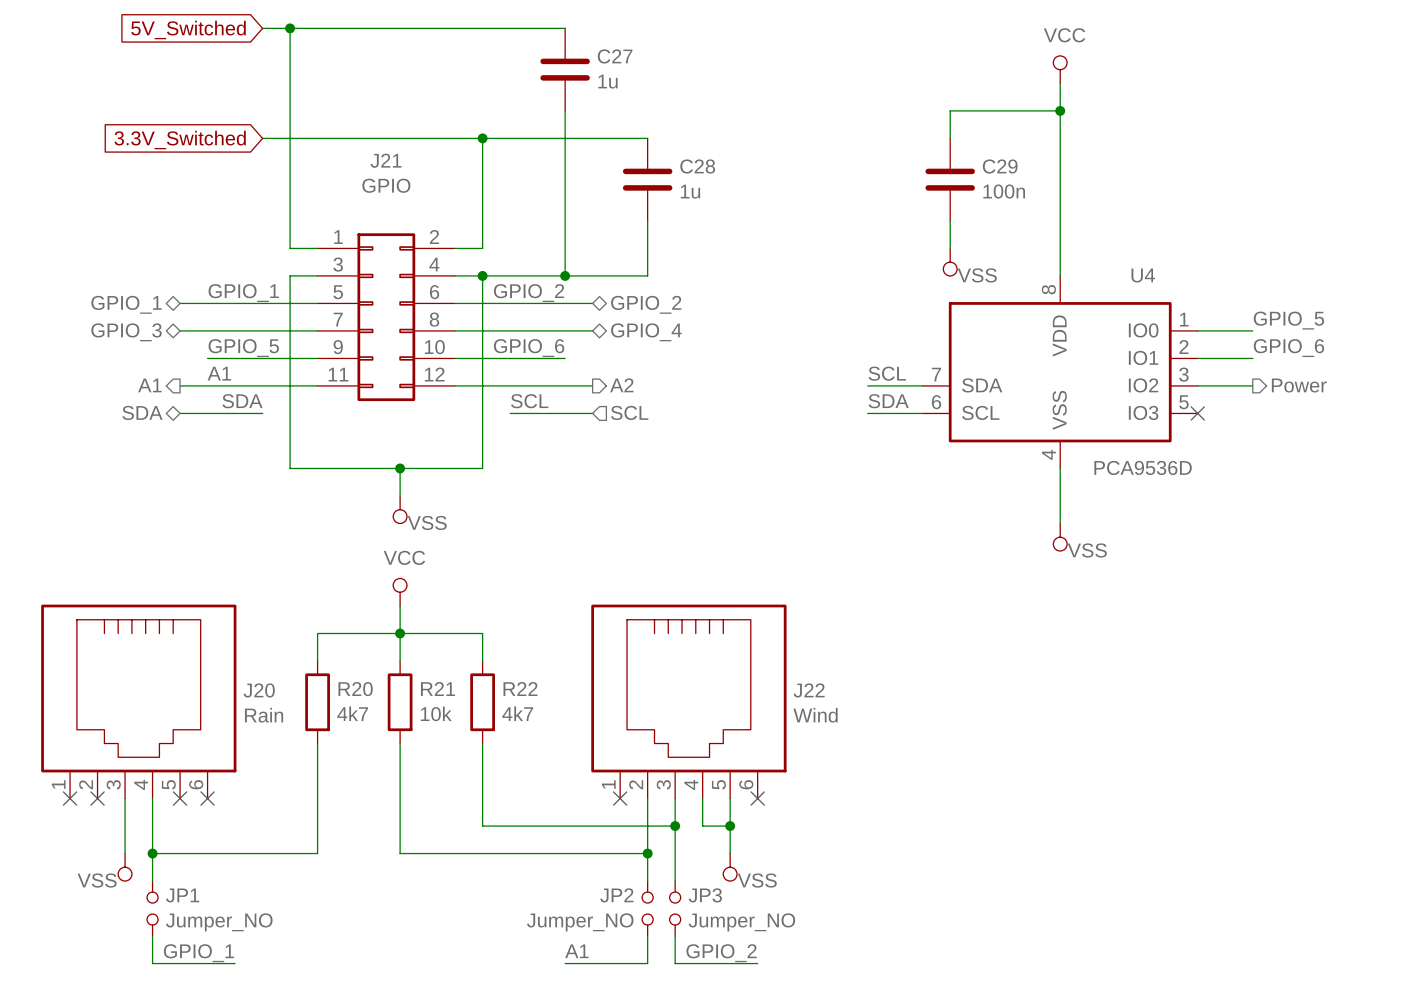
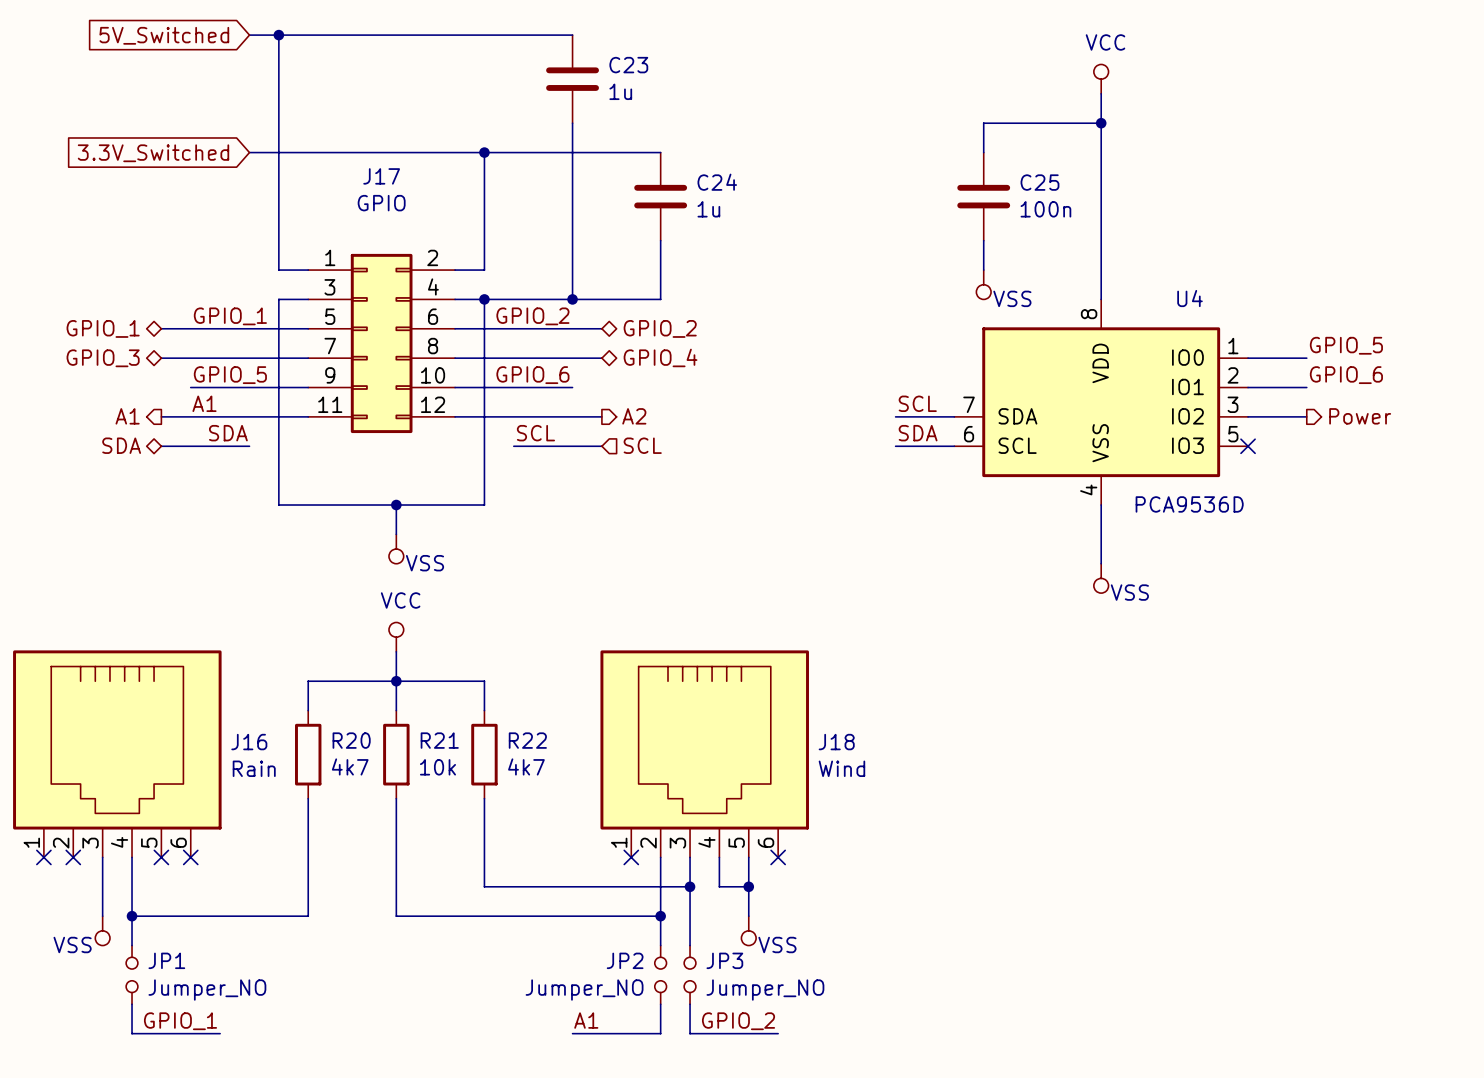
C27 name: C27 (615, 56) -> C23 (628, 65)
J21 name: J21 (386, 160) -> J17 (381, 176)
C28 name: C28 (697, 166) -> C24 (717, 182)
C29 name: C29 (1000, 166) -> C25 (1039, 182)
J20 name: J20 (259, 690) -> J16 (249, 742)
J22 name: J22 (809, 690) -> J18 (836, 742)

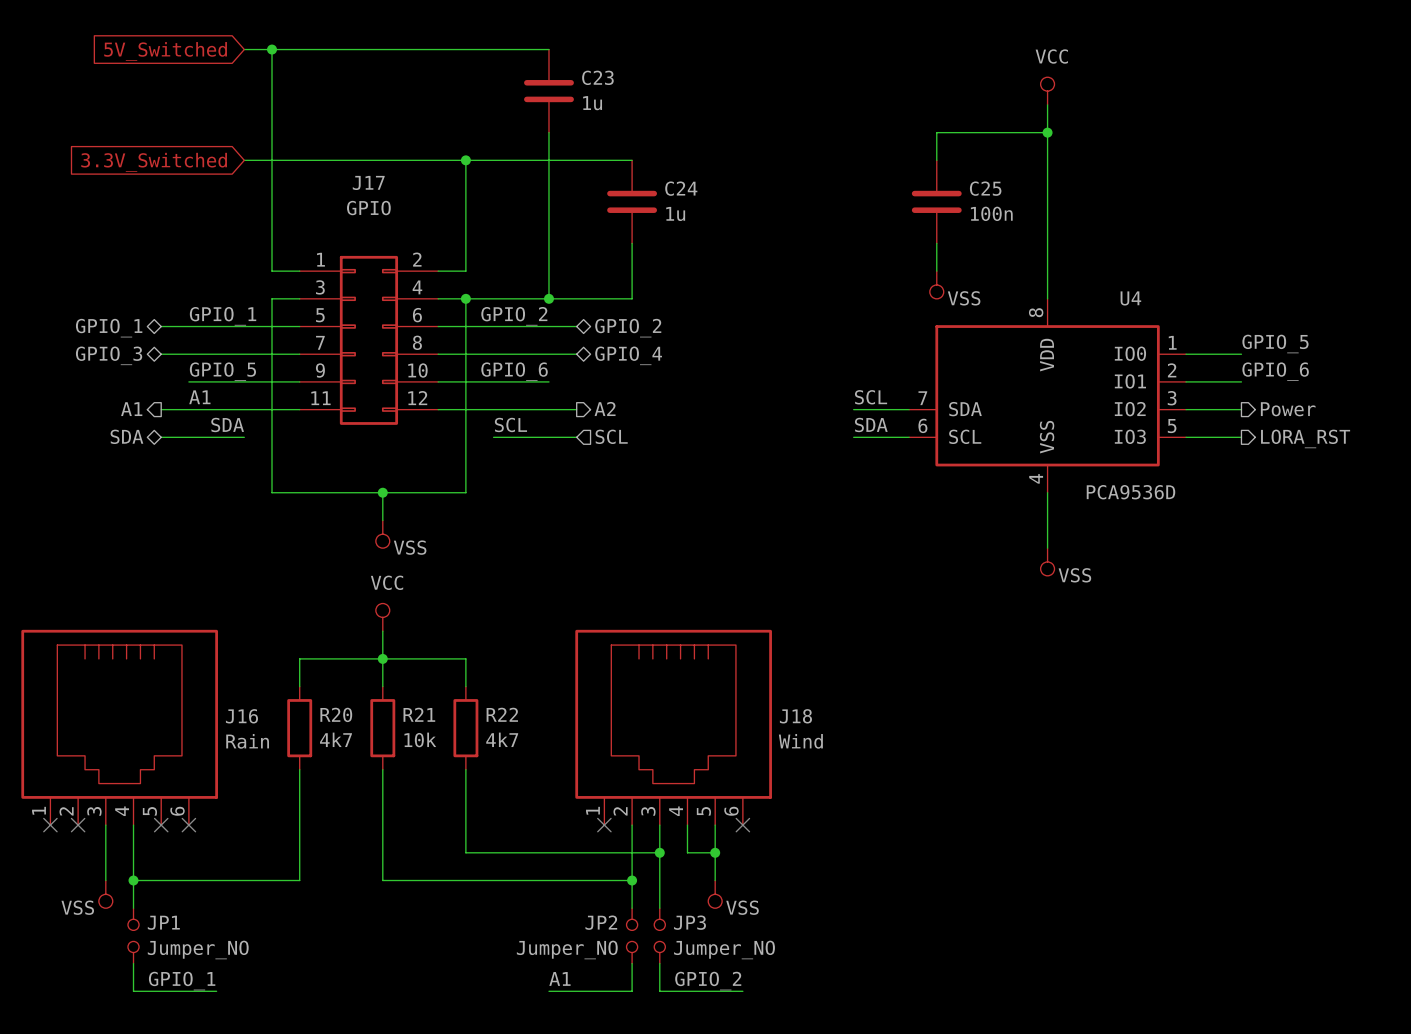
wire: none -> (1186, 437) (1241, 437)
no-connect mark: (1248, 446) -> none
hierarchical label: none -> LORA_RST (1305, 438)

